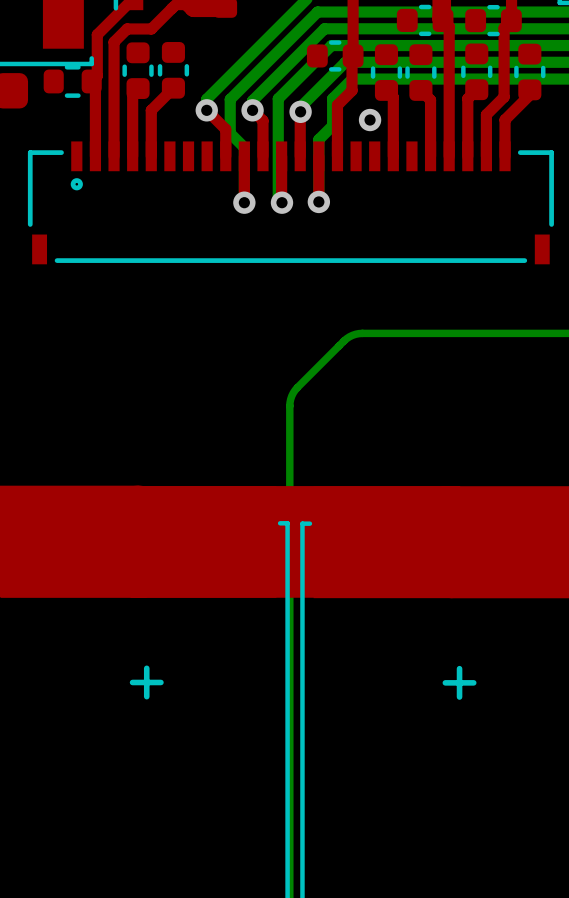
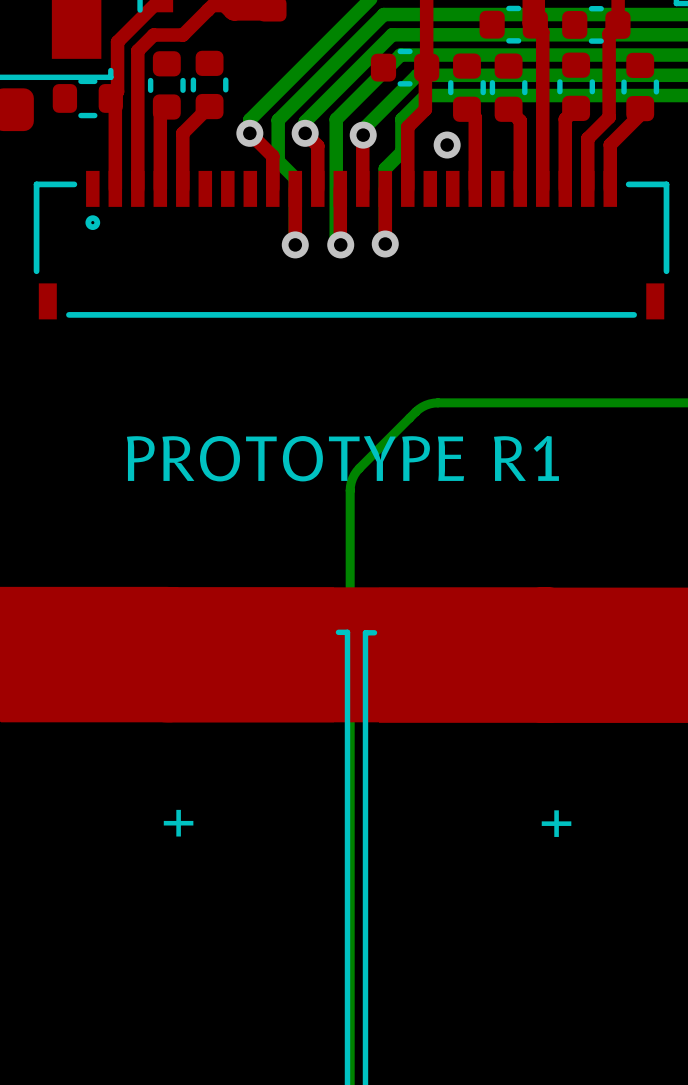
text: none -> PROTOTYPE R1 (342, 458)

